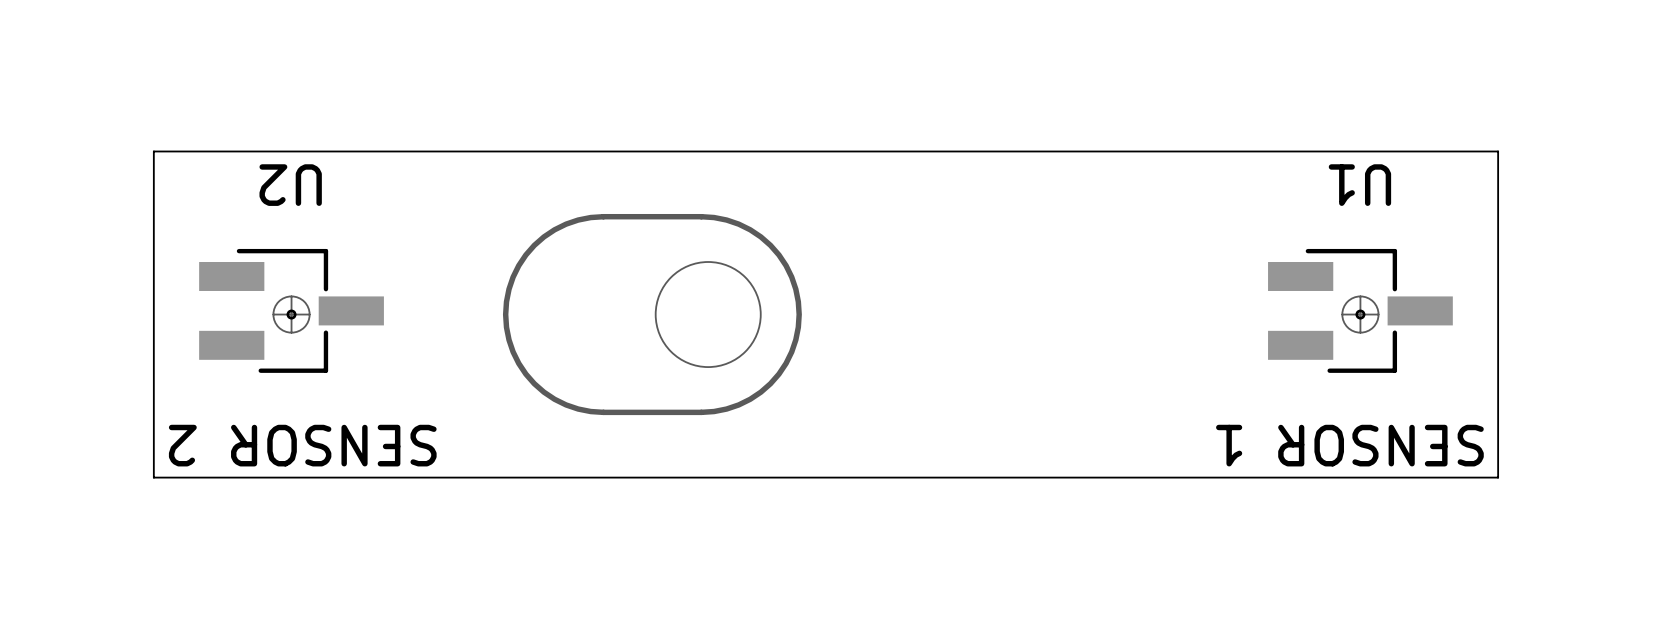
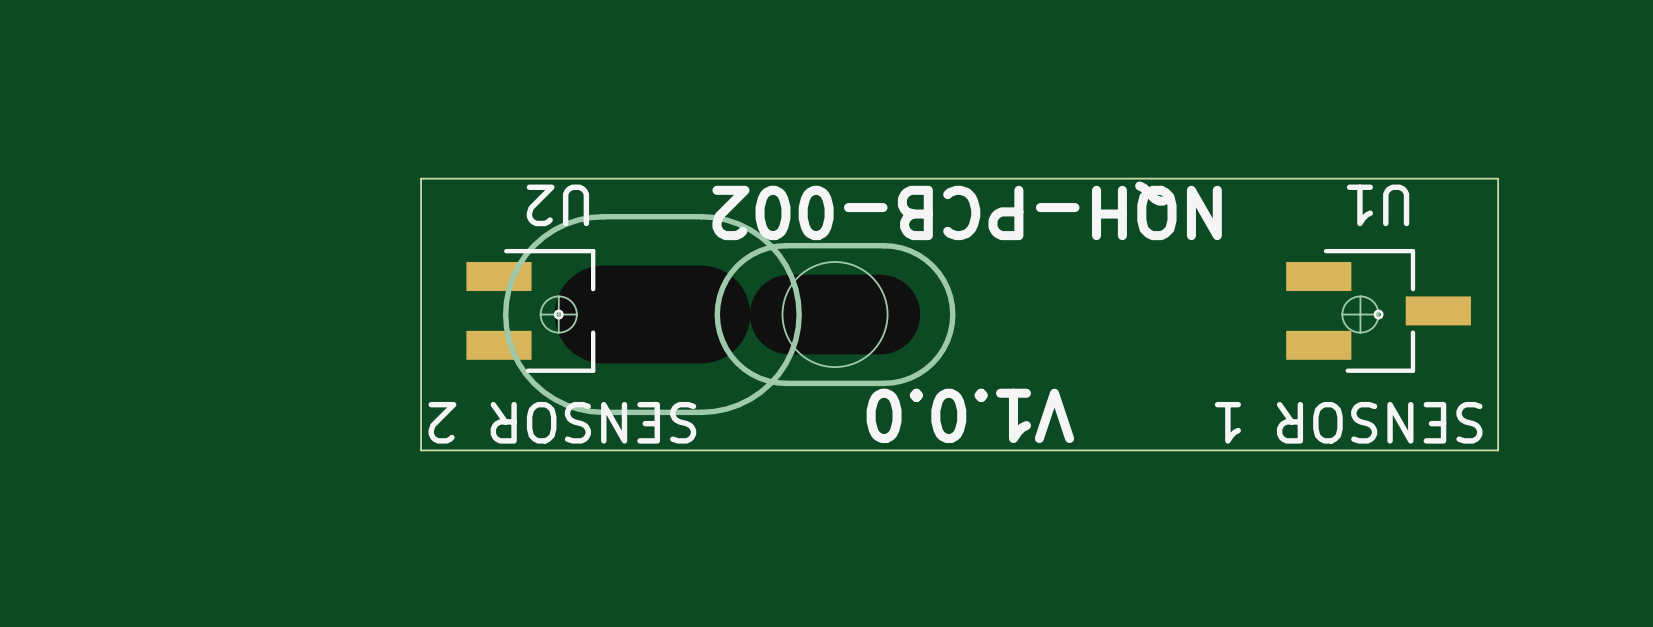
board edge: (1498, 178) (1498, 151) (153, 151) (153, 477) (1498, 477) (1498, 450) -> (1498, 178) (421, 178) (421, 450) (1498, 450)
U2 name position: U2 (290, 185) -> U2 (557, 205)
U1 name position: U1 (1359, 185) -> U1 (1378, 205)
text: none -> NQH-PCB-002 (967, 210)
line: (291, 296) (291, 332) -> (558, 296) (558, 332)
U2 position: (291, 310) -> (558, 310)
U1 position: (1360, 310) -> (1378, 310)
line: (273, 314) (309, 314) -> (540, 314) (576, 314)
drawing position: (291, 314) -> (558, 314)
drawing position: (708, 314) -> (835, 314)
part: none -> (835, 314)
text: none -> V1.0.0 (970, 415)
text position: SENSOR 2 (302, 445) -> SENSOR 2 (562, 422)
text position: SENSOR 1 (1349, 445) -> SENSOR 1 (1348, 422)

